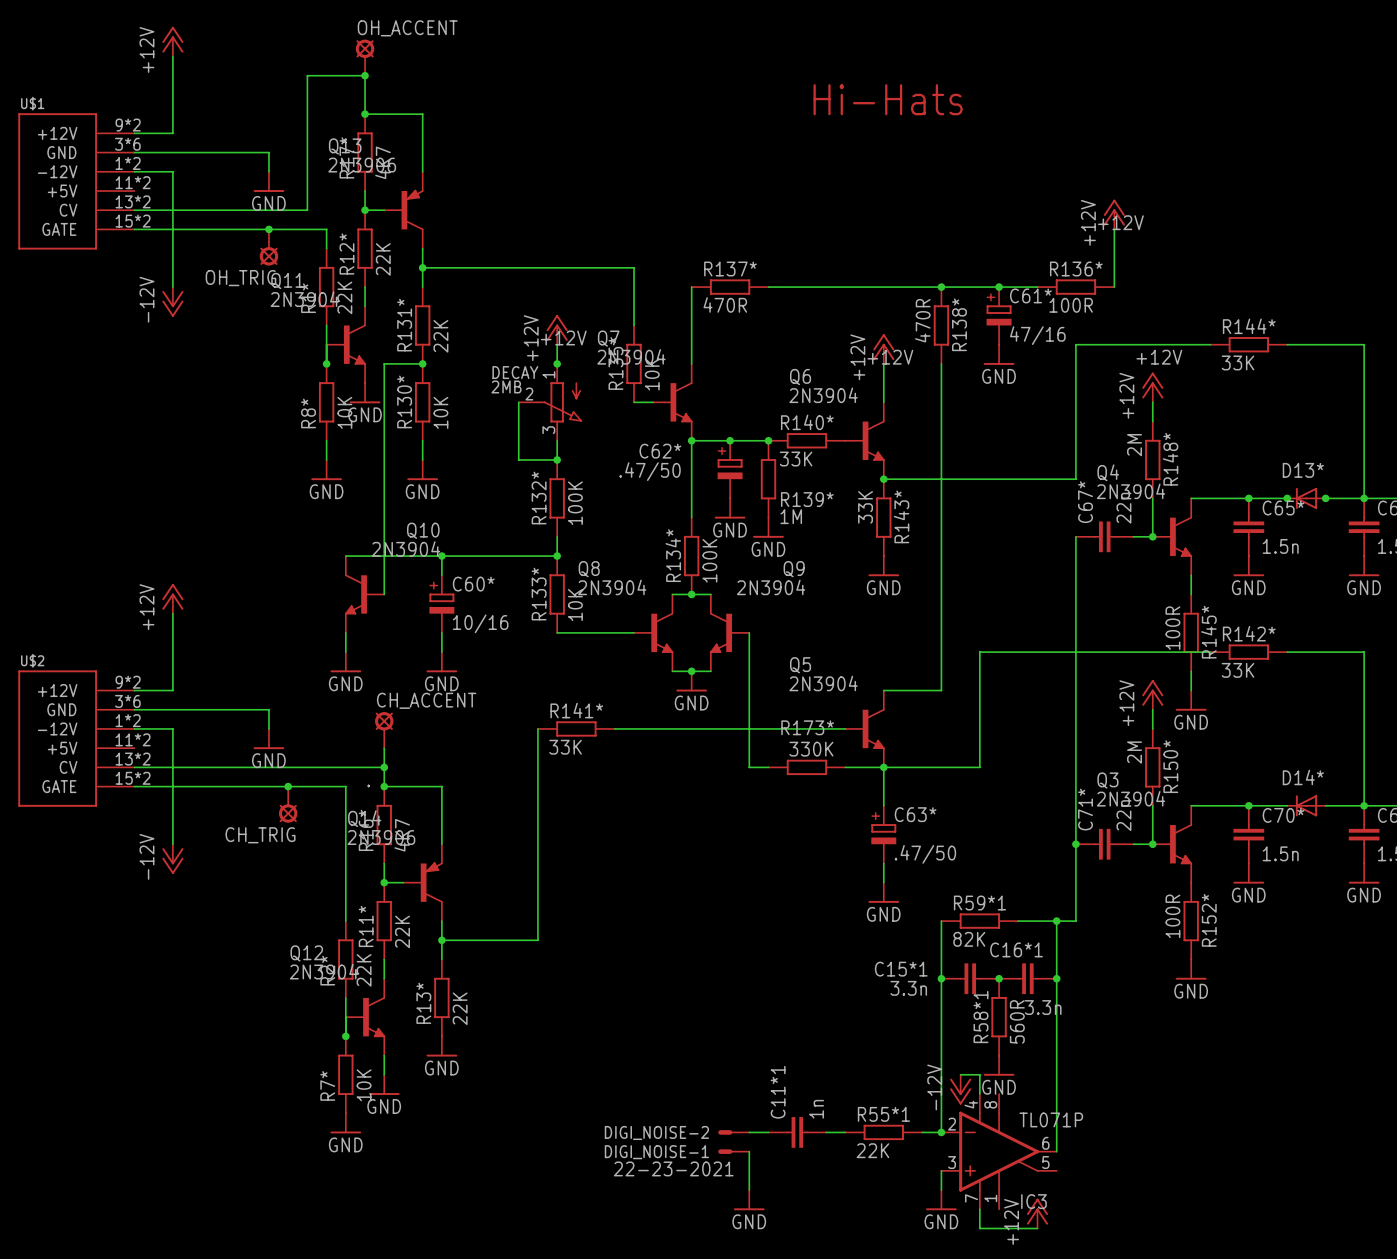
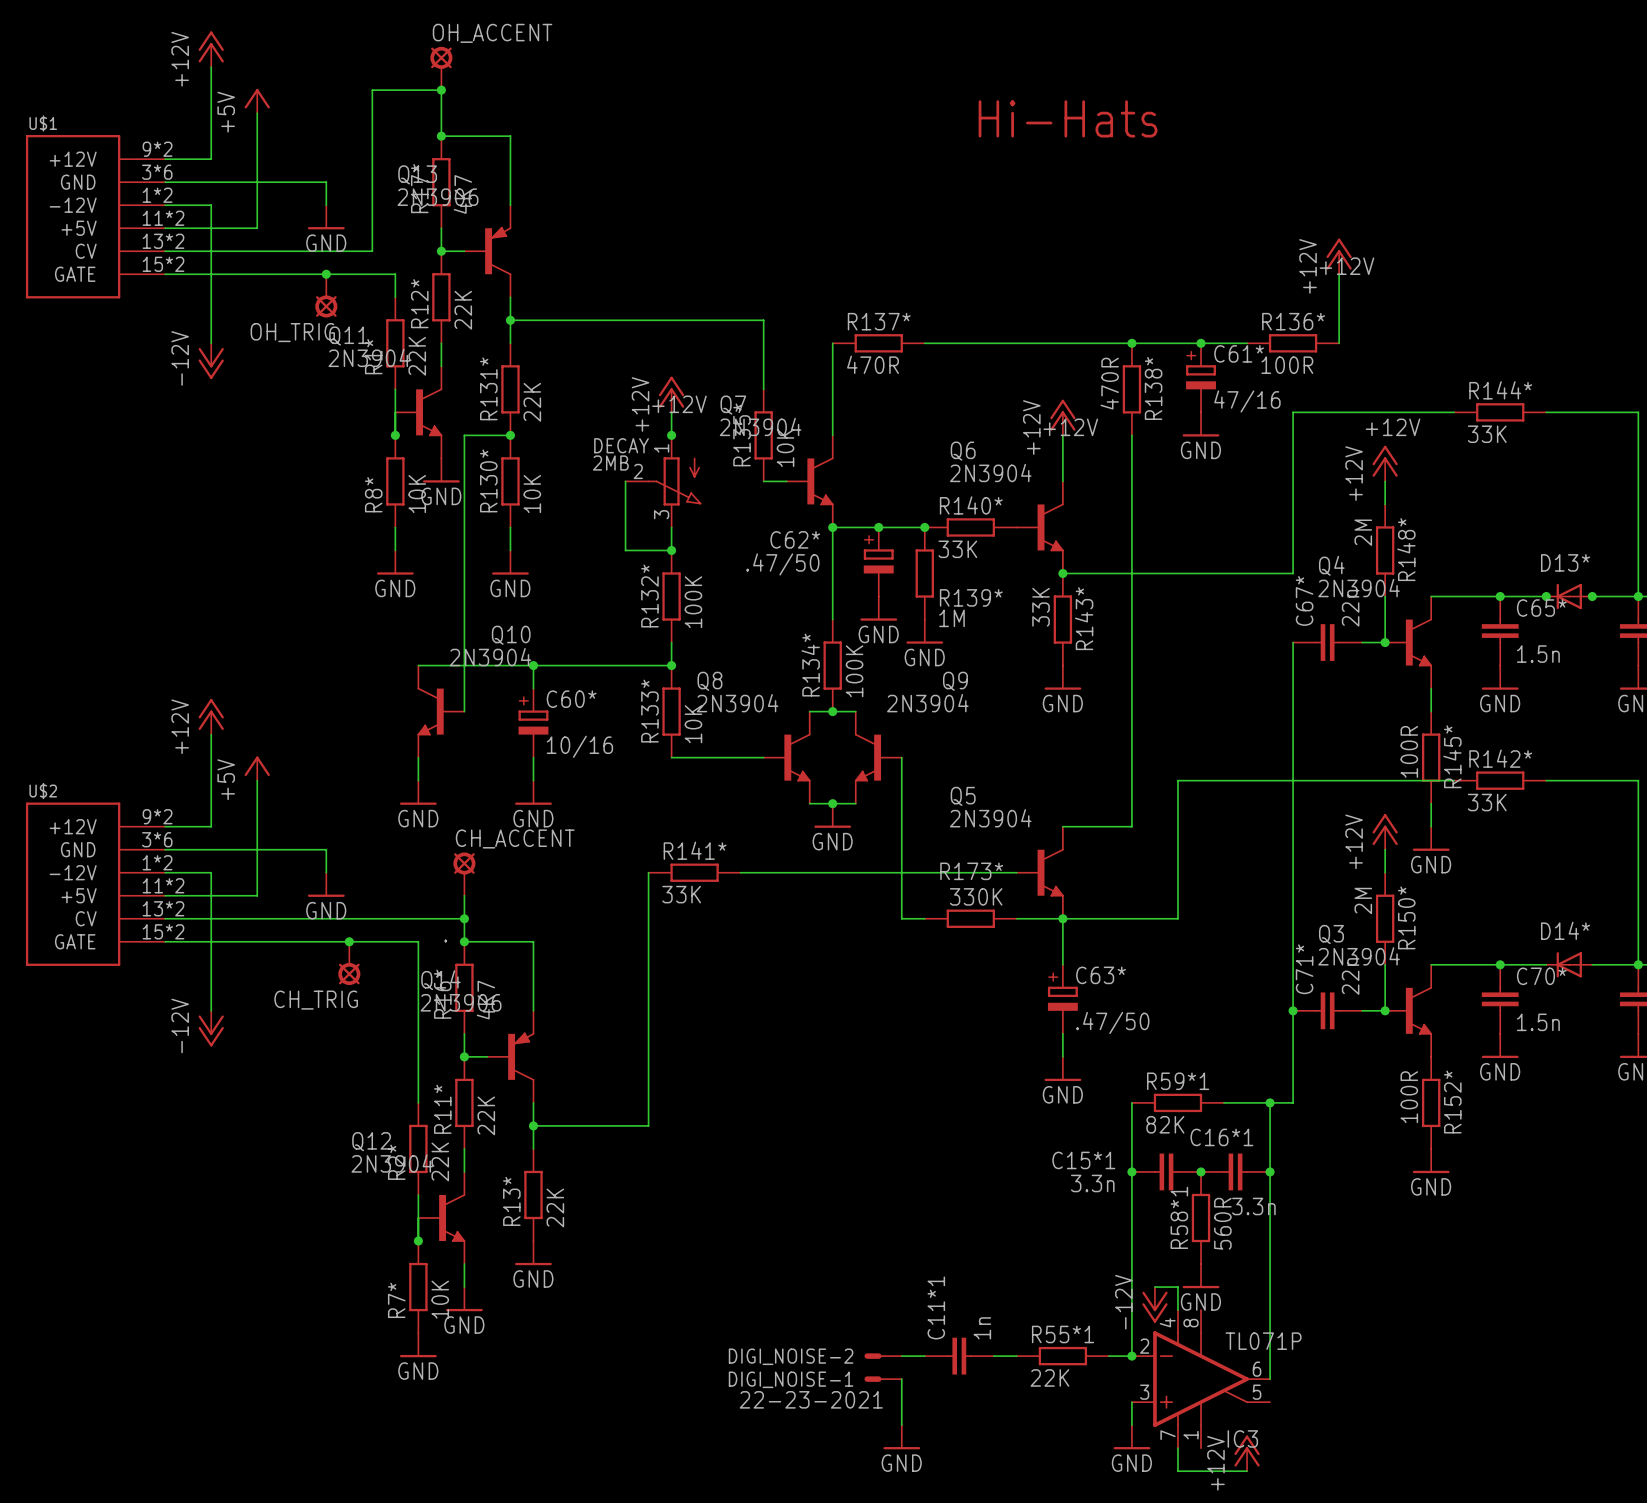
power symbol: none -> +5V (257, 101)
wire: none -> (257, 113) (257, 228) (165, 228)
power symbol: none -> +5V (257, 768)
wire: none -> (257, 780) (257, 895) (165, 895)

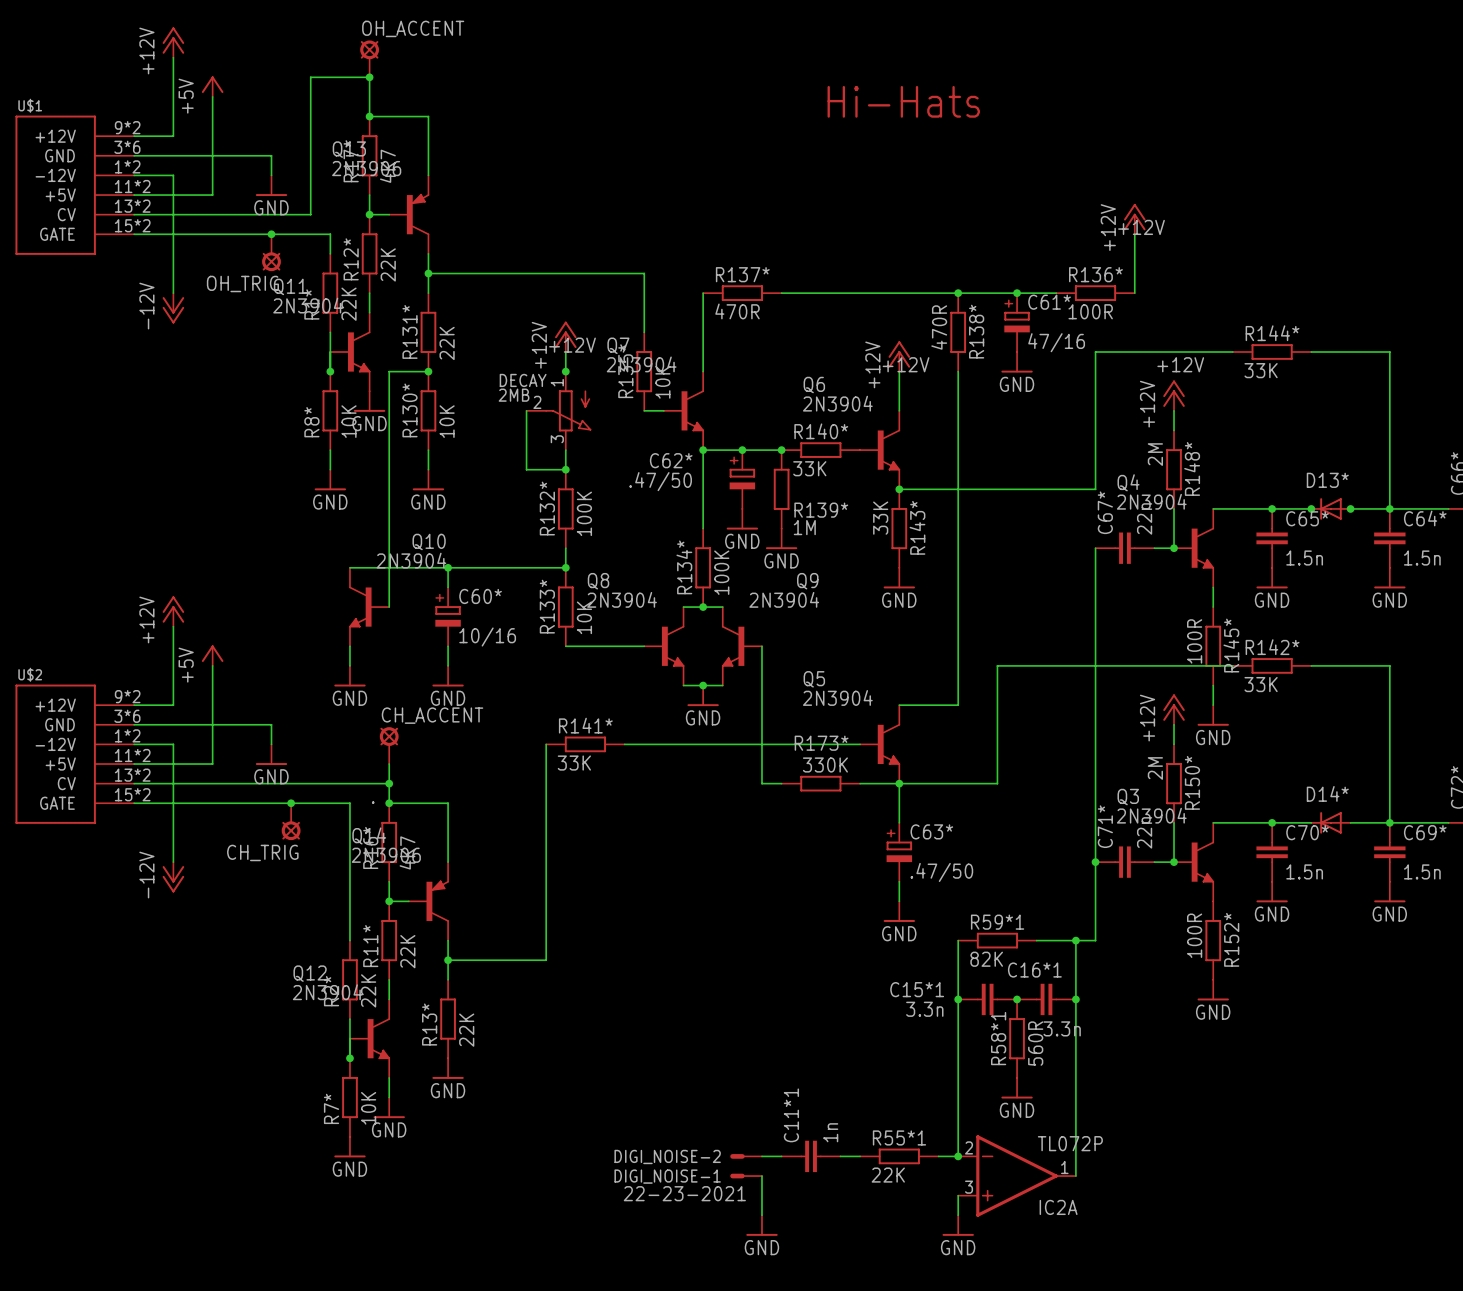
wire: (1154, 1287) (1177, 1287) (1177, 1310) -> none
power symbol: -12V (1154, 1304) -> none
IC3: TL071P (1201, 1379) -> none
IC2A: none -> TL072P (1017, 1176)
wire: (1177, 1448) (1177, 1471) (1247, 1471) -> none
power symbol: +12V (1247, 1453) -> none

